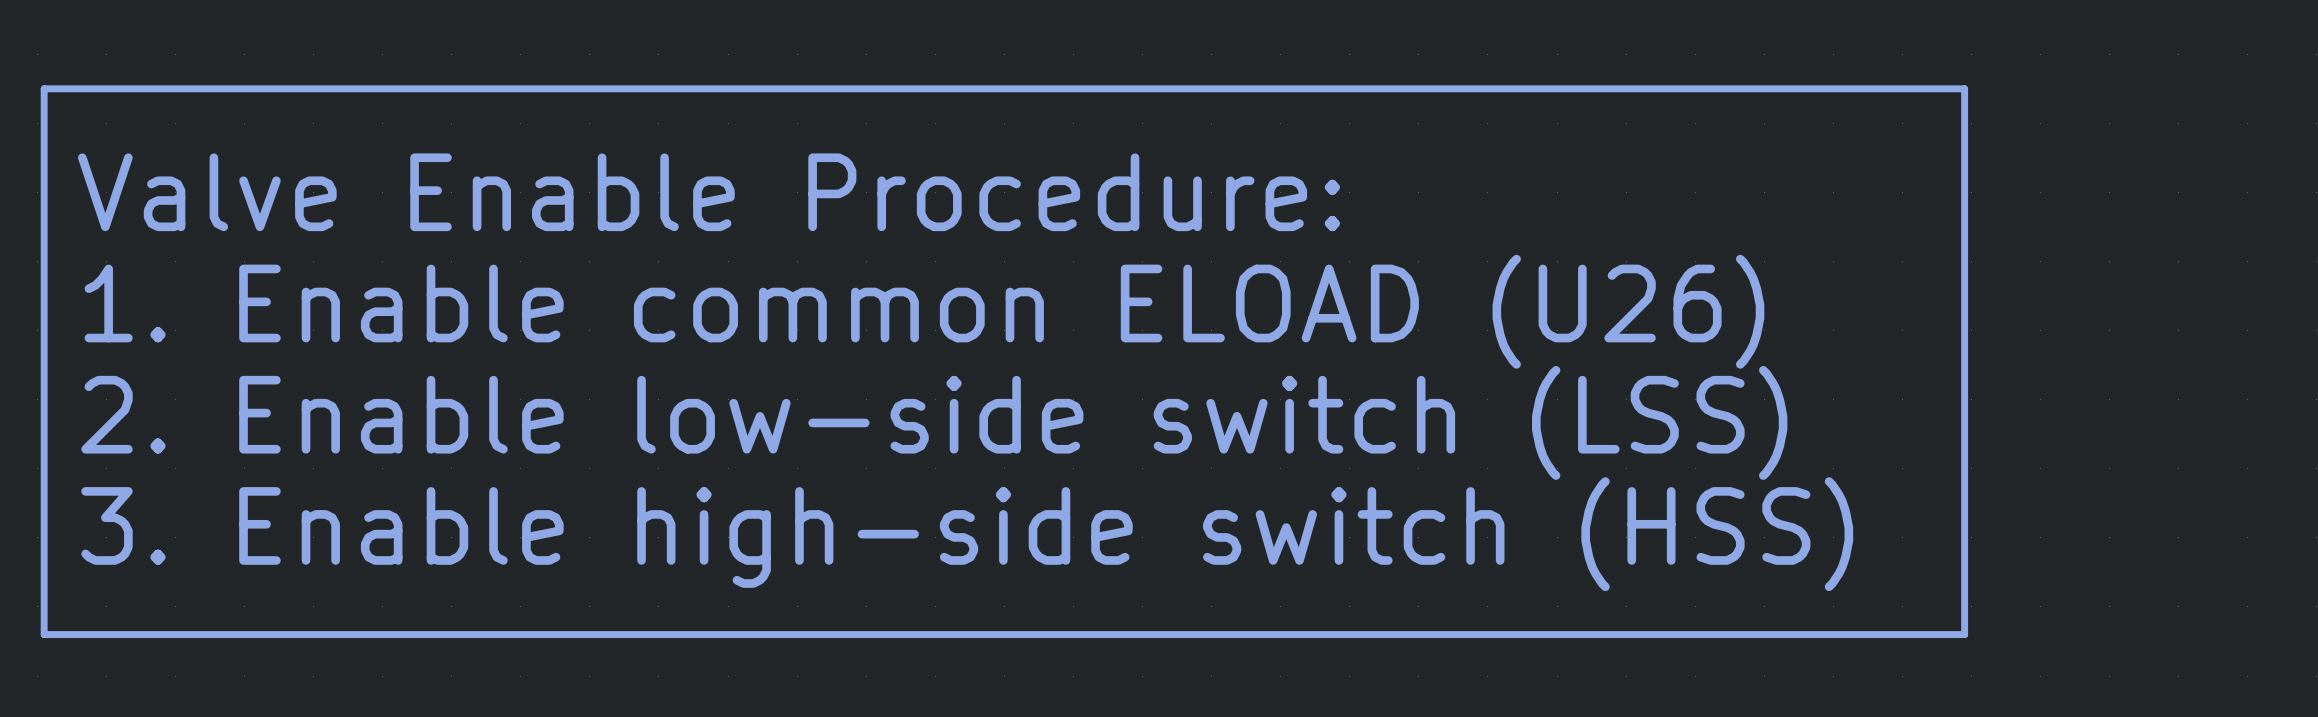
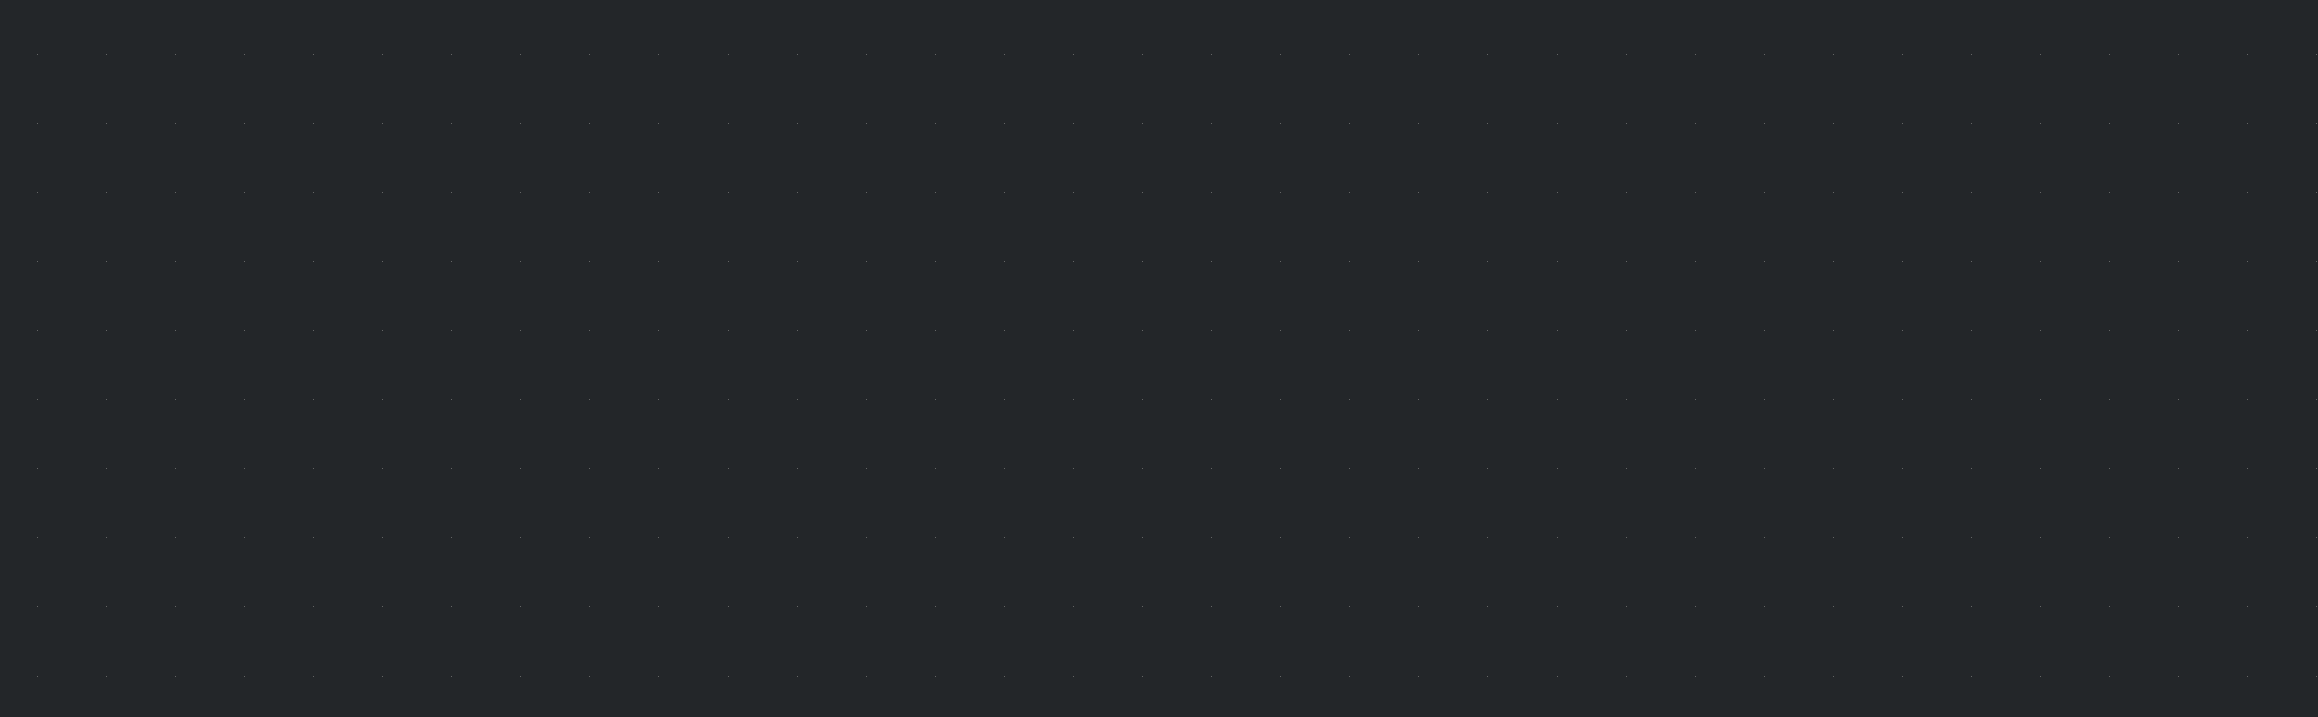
line: (44, 88) (1964, 88) (1964, 634) (44, 634) (44, 88) -> none
text: Valve Enable Procedure: (708, 192) -> none
text: 1. Enable common ELOAD (U26) (924, 311) -> none
text: 2. Enable low-side switch (LSS) (934, 422) -> none
text: 3. Enable high-side switch (HSS) (967, 534) -> none

